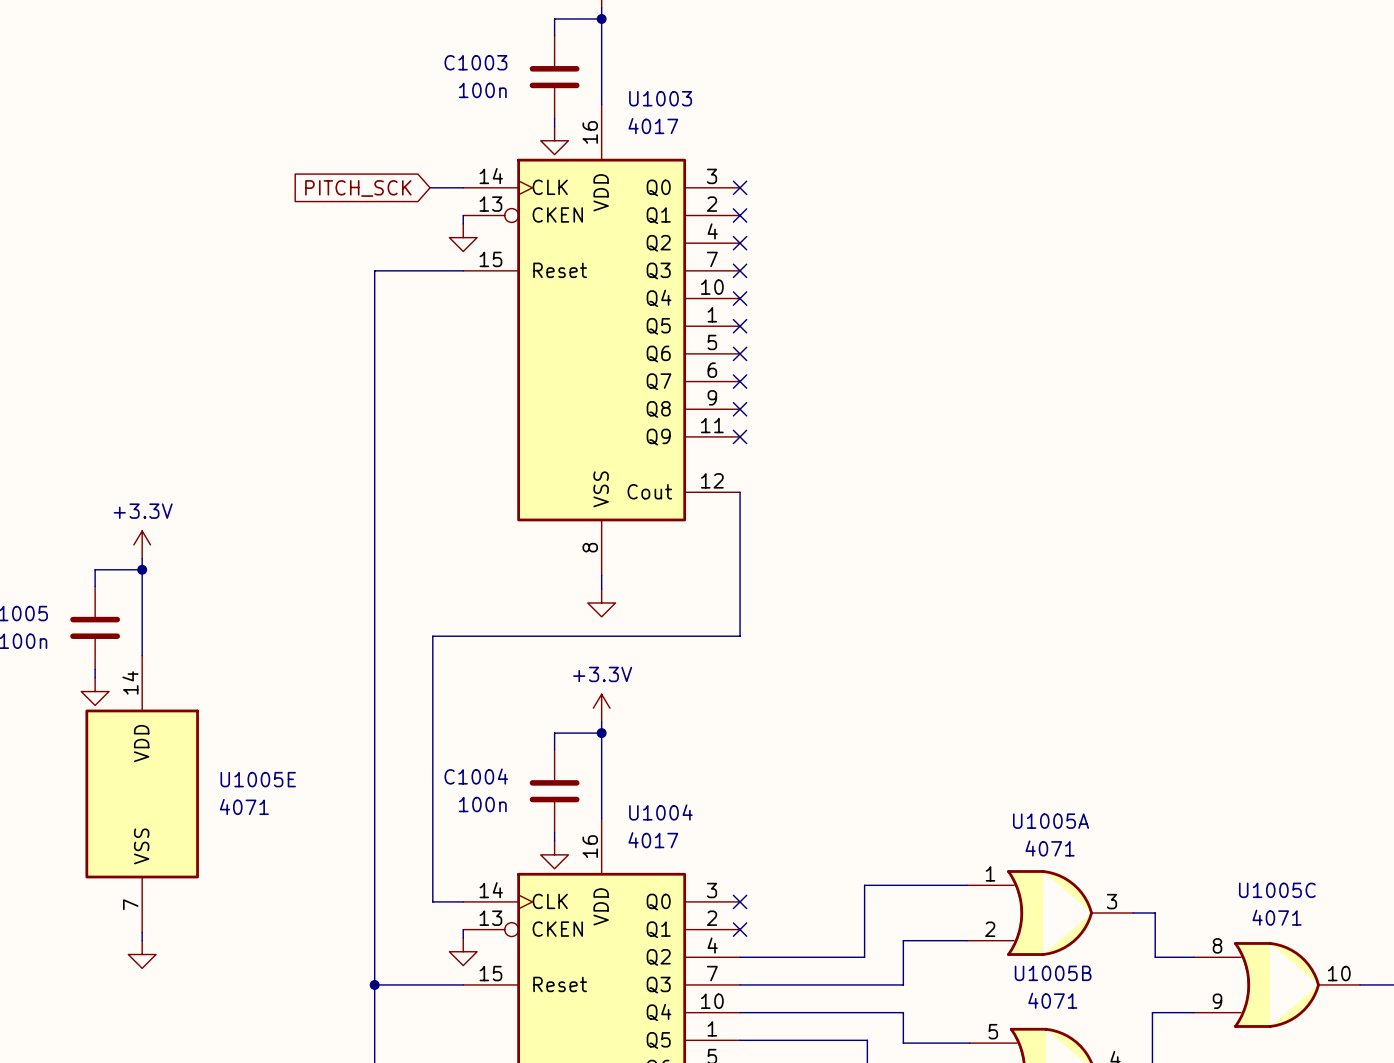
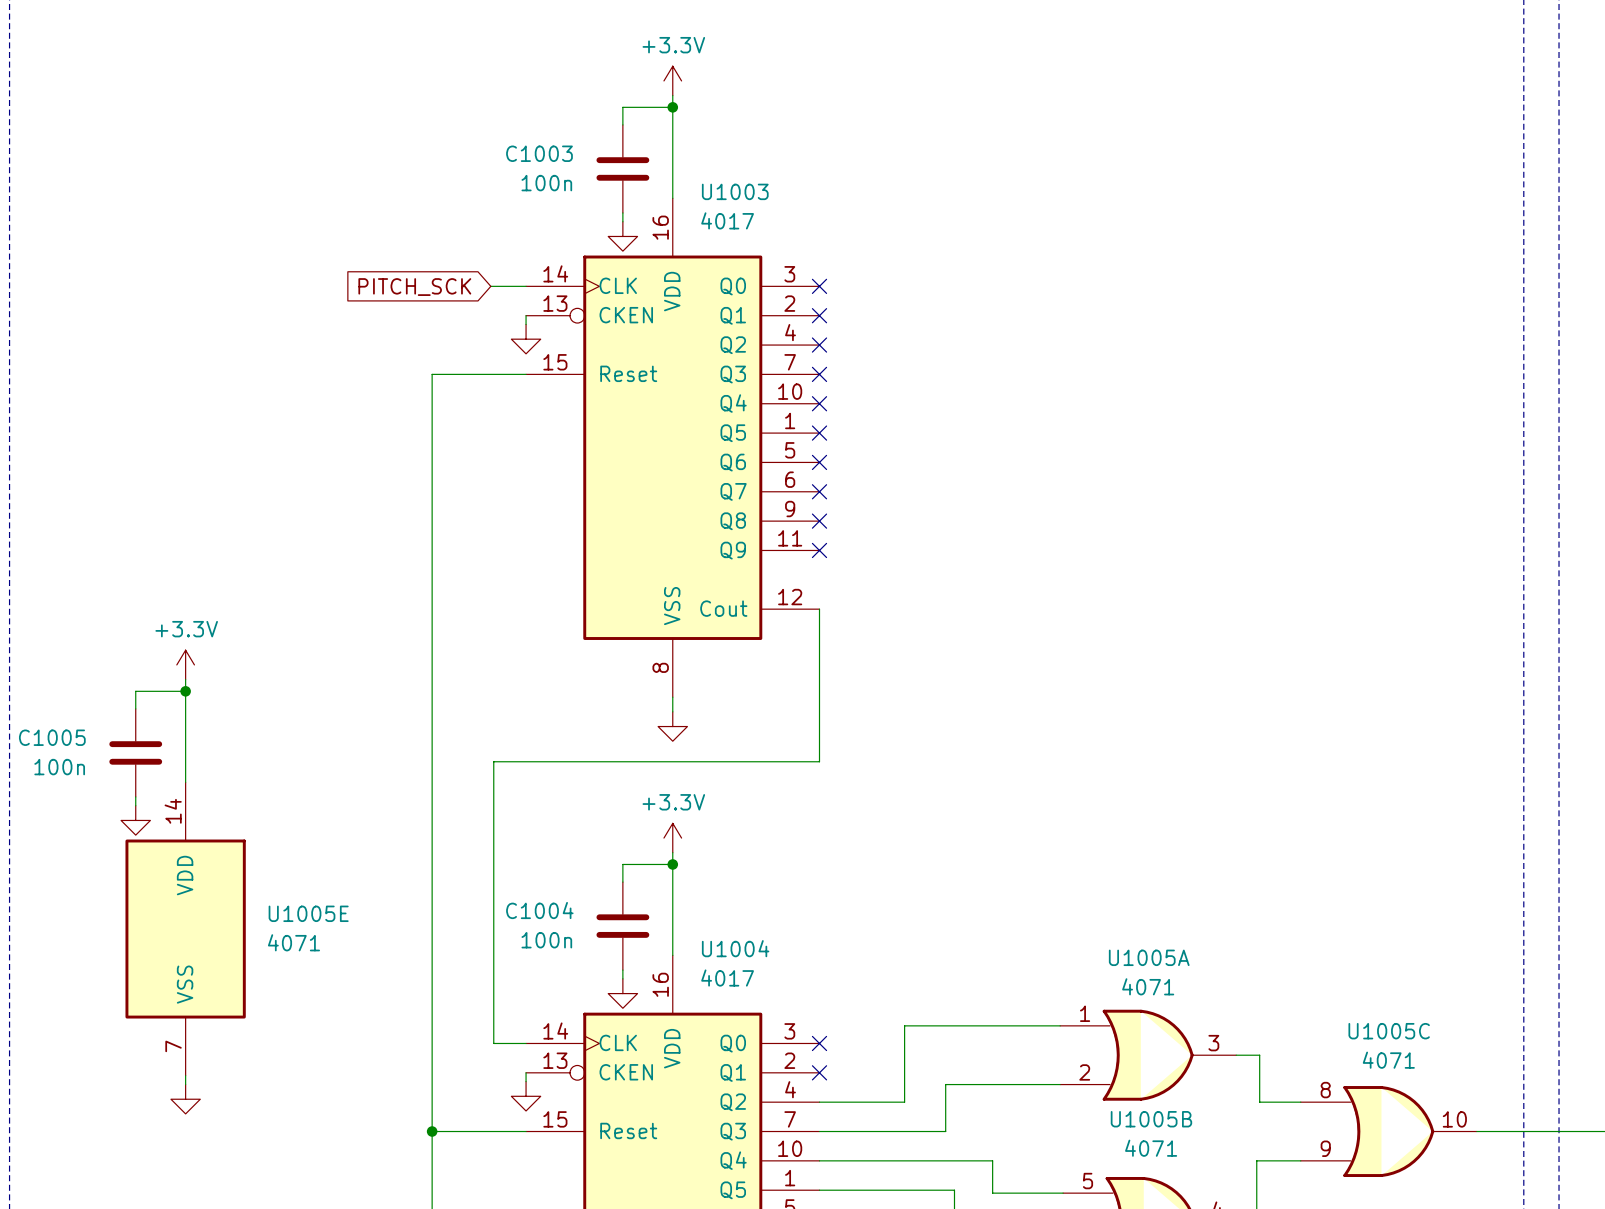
wire: (864, 885) (864, 957) (820, 957) -> (951, 1025) (904, 1025) (904, 1102)
wire: (903, 940) (903, 984) (859, 984) -> (992, 1084) (945, 1084) (945, 1131)

